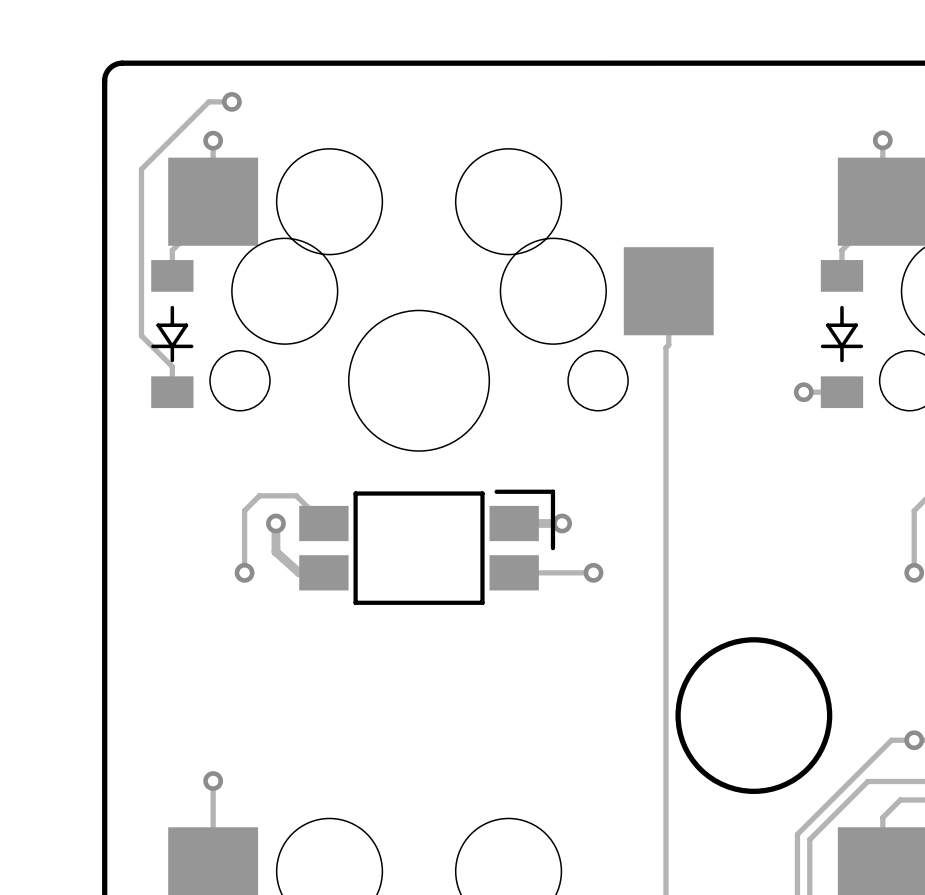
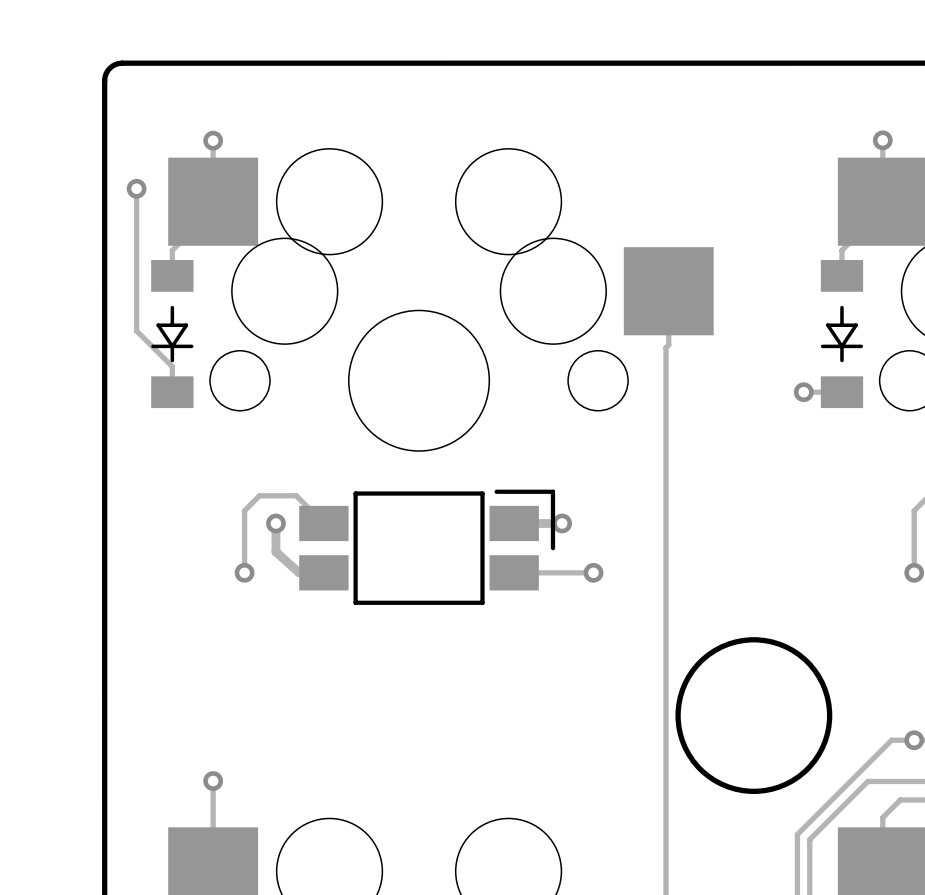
track: (231, 101) (208, 101) (141, 169) (141, 335) -> (136, 188) (136, 330) (141, 335)
via position: (231, 101) -> (136, 188)

